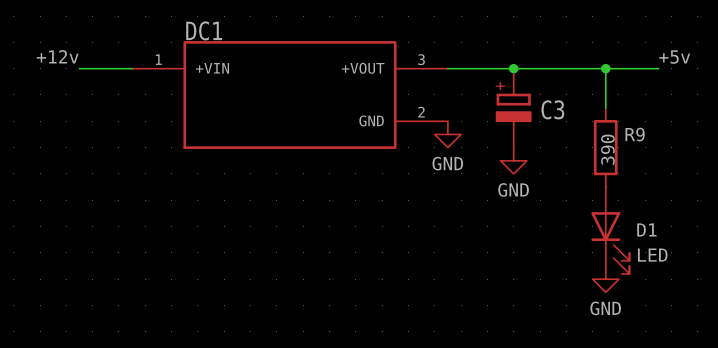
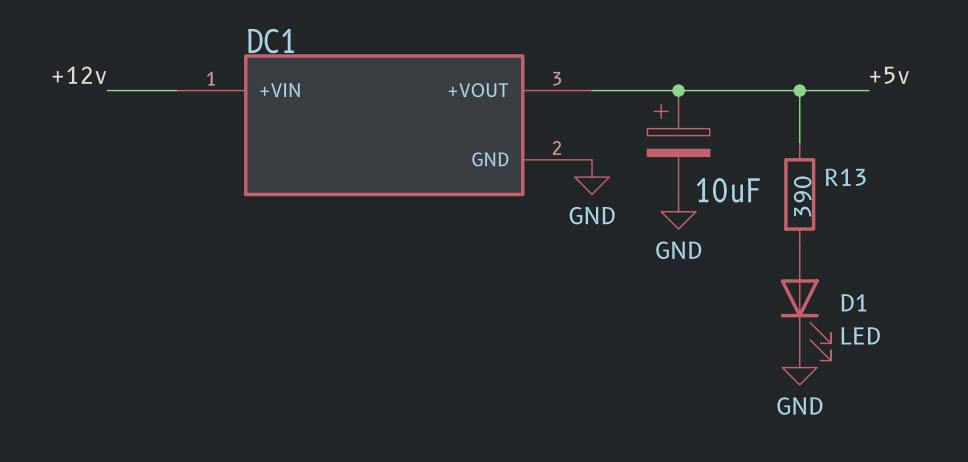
C3: (513, 108) -> none
part: none -> 10uF (678, 142)
R9 name: R9 (635, 134) -> R13 (845, 177)

